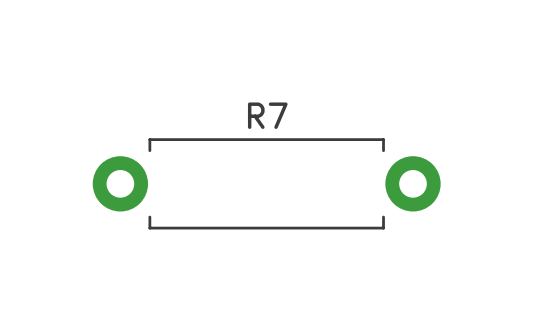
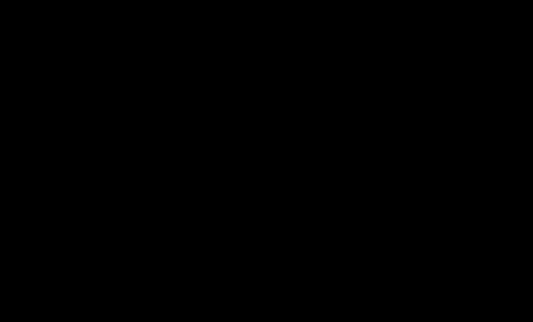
R7: (266, 183) -> none

